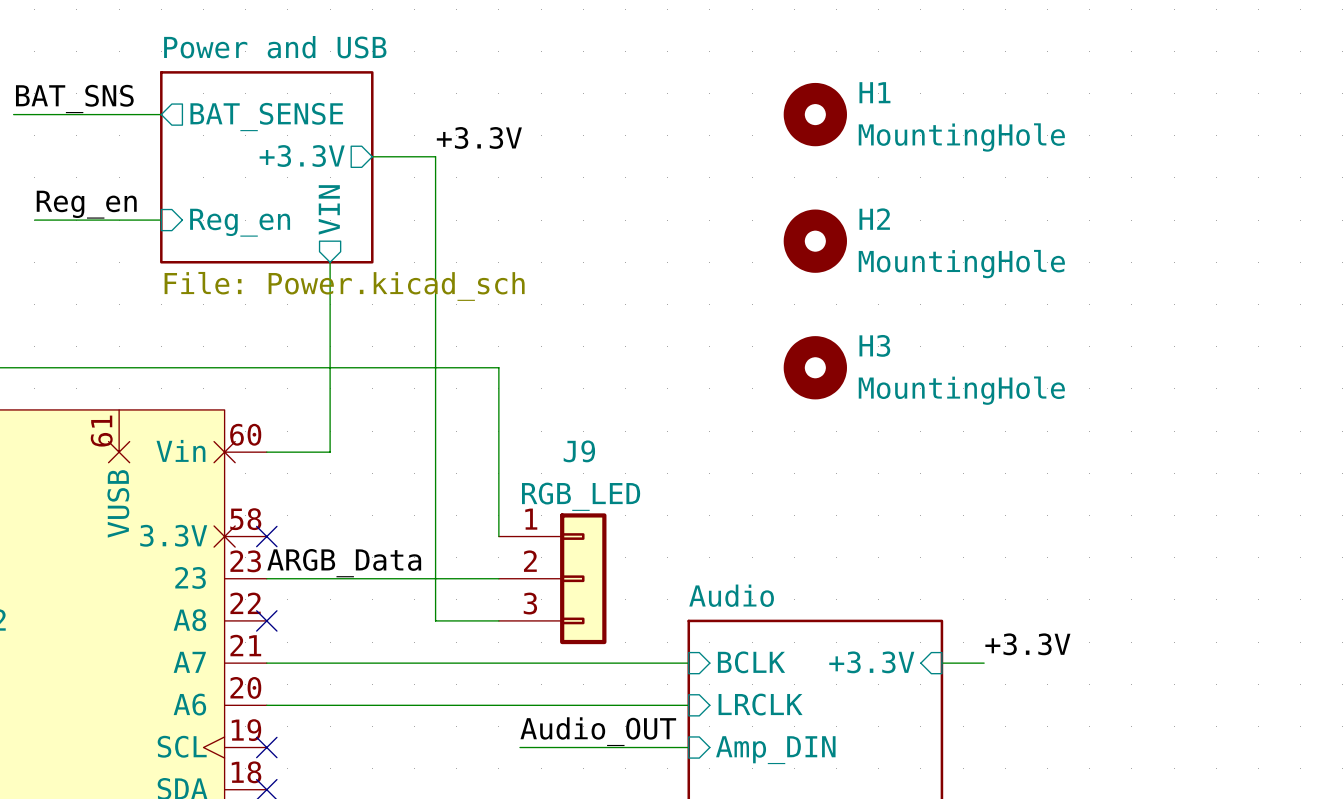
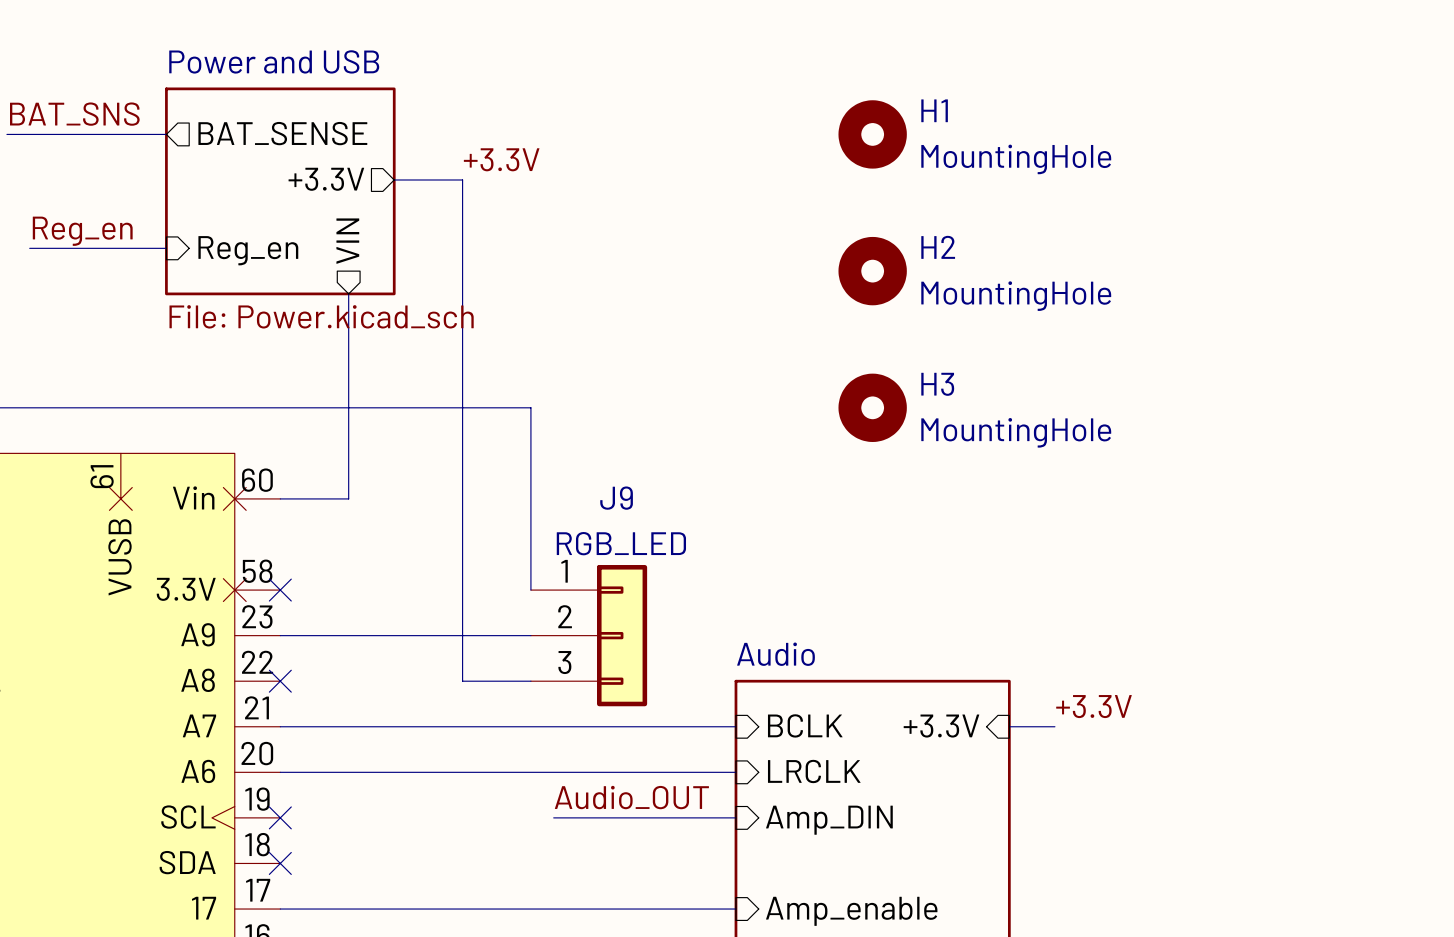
label: ARGB_Data (344, 563) -> none
part pin name: 23 (190, 577) -> A9 (197, 634)

